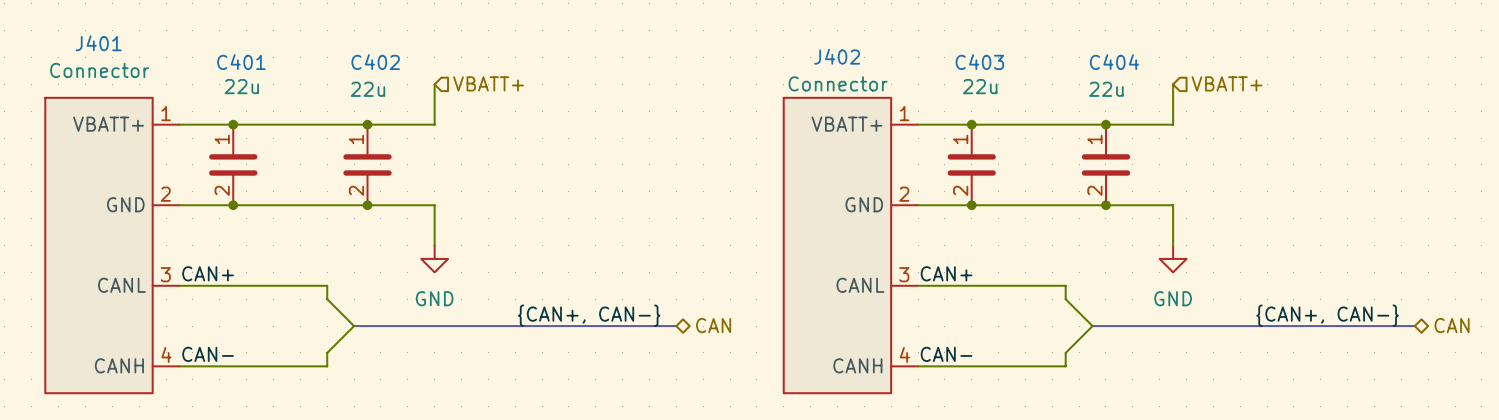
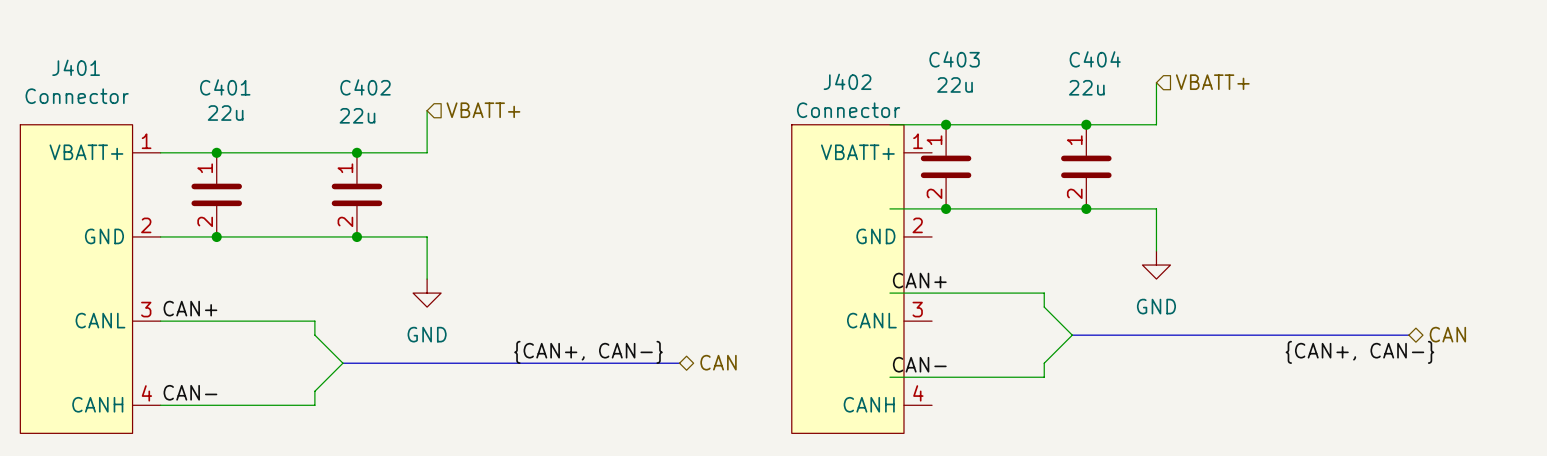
hierarchical label position: VBATT+ (1227, 83) -> VBATT+ (1212, 82)
wire: (1173, 84) (1173, 124) (918, 124) -> (1156, 82) (1156, 124) (889, 124)
junction: none -> (946, 124)
junction: none -> (1086, 124)
junction: (971, 124) -> none
junction: (1105, 124) -> none
C403 position: (971, 164) -> (946, 166)
C404 position: (1105, 164) -> (1086, 166)
junction: none -> (946, 208)
junction: none -> (1086, 208)
wire: (918, 205) (1173, 205) (1173, 245) -> (889, 208) (1156, 208) (1156, 251)
junction: (971, 205) -> none
junction: (1105, 205) -> none
power symbol position: GND (1173, 258) -> GND (1156, 265)
label position: CAN+ (946, 273) -> CAN+ (919, 280)
wire: (918, 285) (1065, 285) (1065, 299) (1092, 326) (1065, 352) (1065, 366) (918, 366) -> (889, 293) (1044, 293) (1044, 307) (1072, 335) (1044, 363) (1044, 377) (889, 377)
hierarchical label position: CAN (1452, 325) -> CAN (1447, 334)
bus: (1092, 326) (1414, 326) -> (1072, 335) (1408, 335)
label position: CAN- (946, 354) -> CAN- (919, 364)

